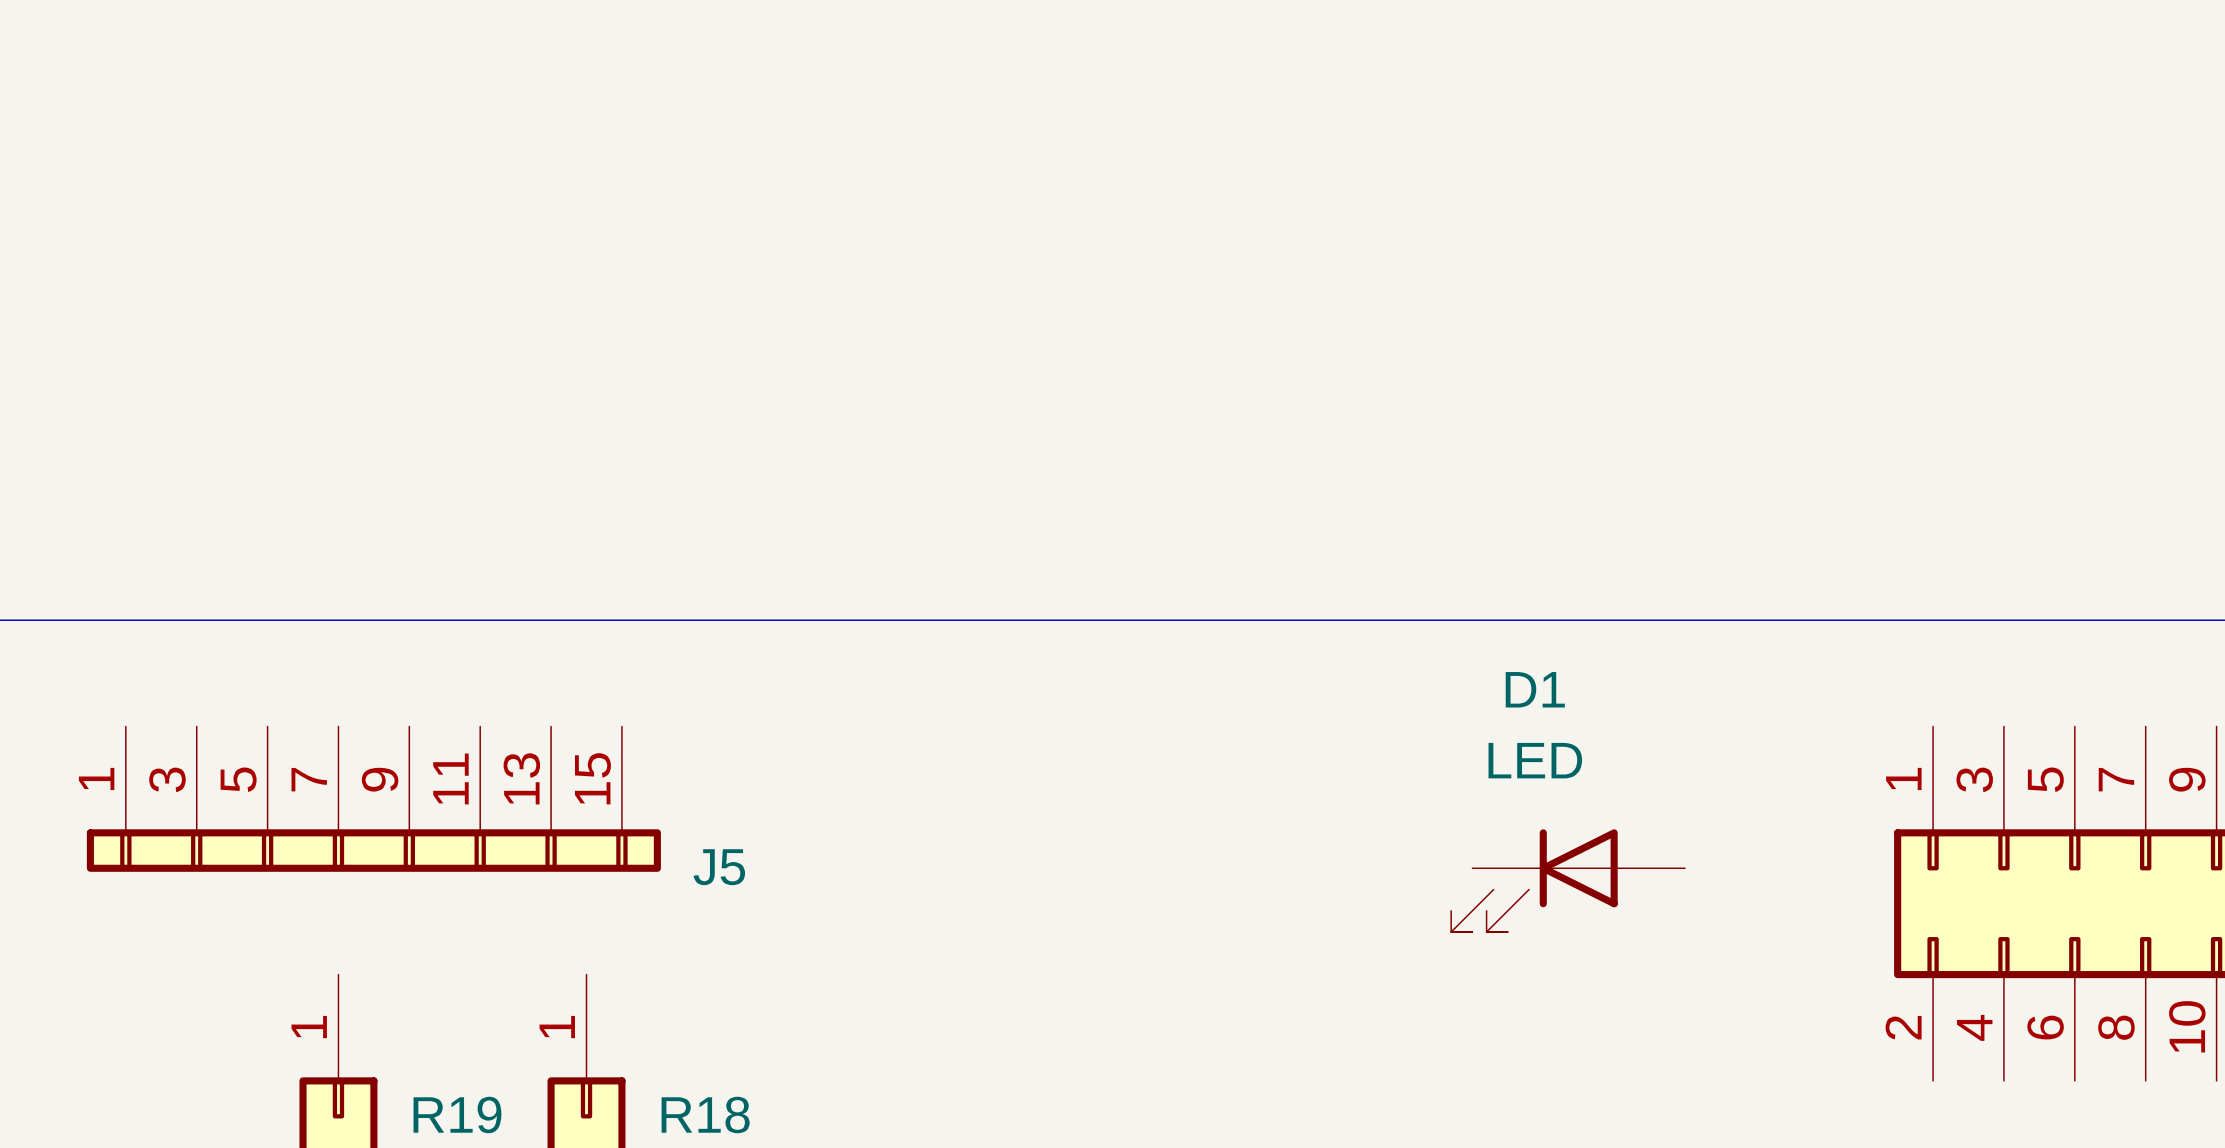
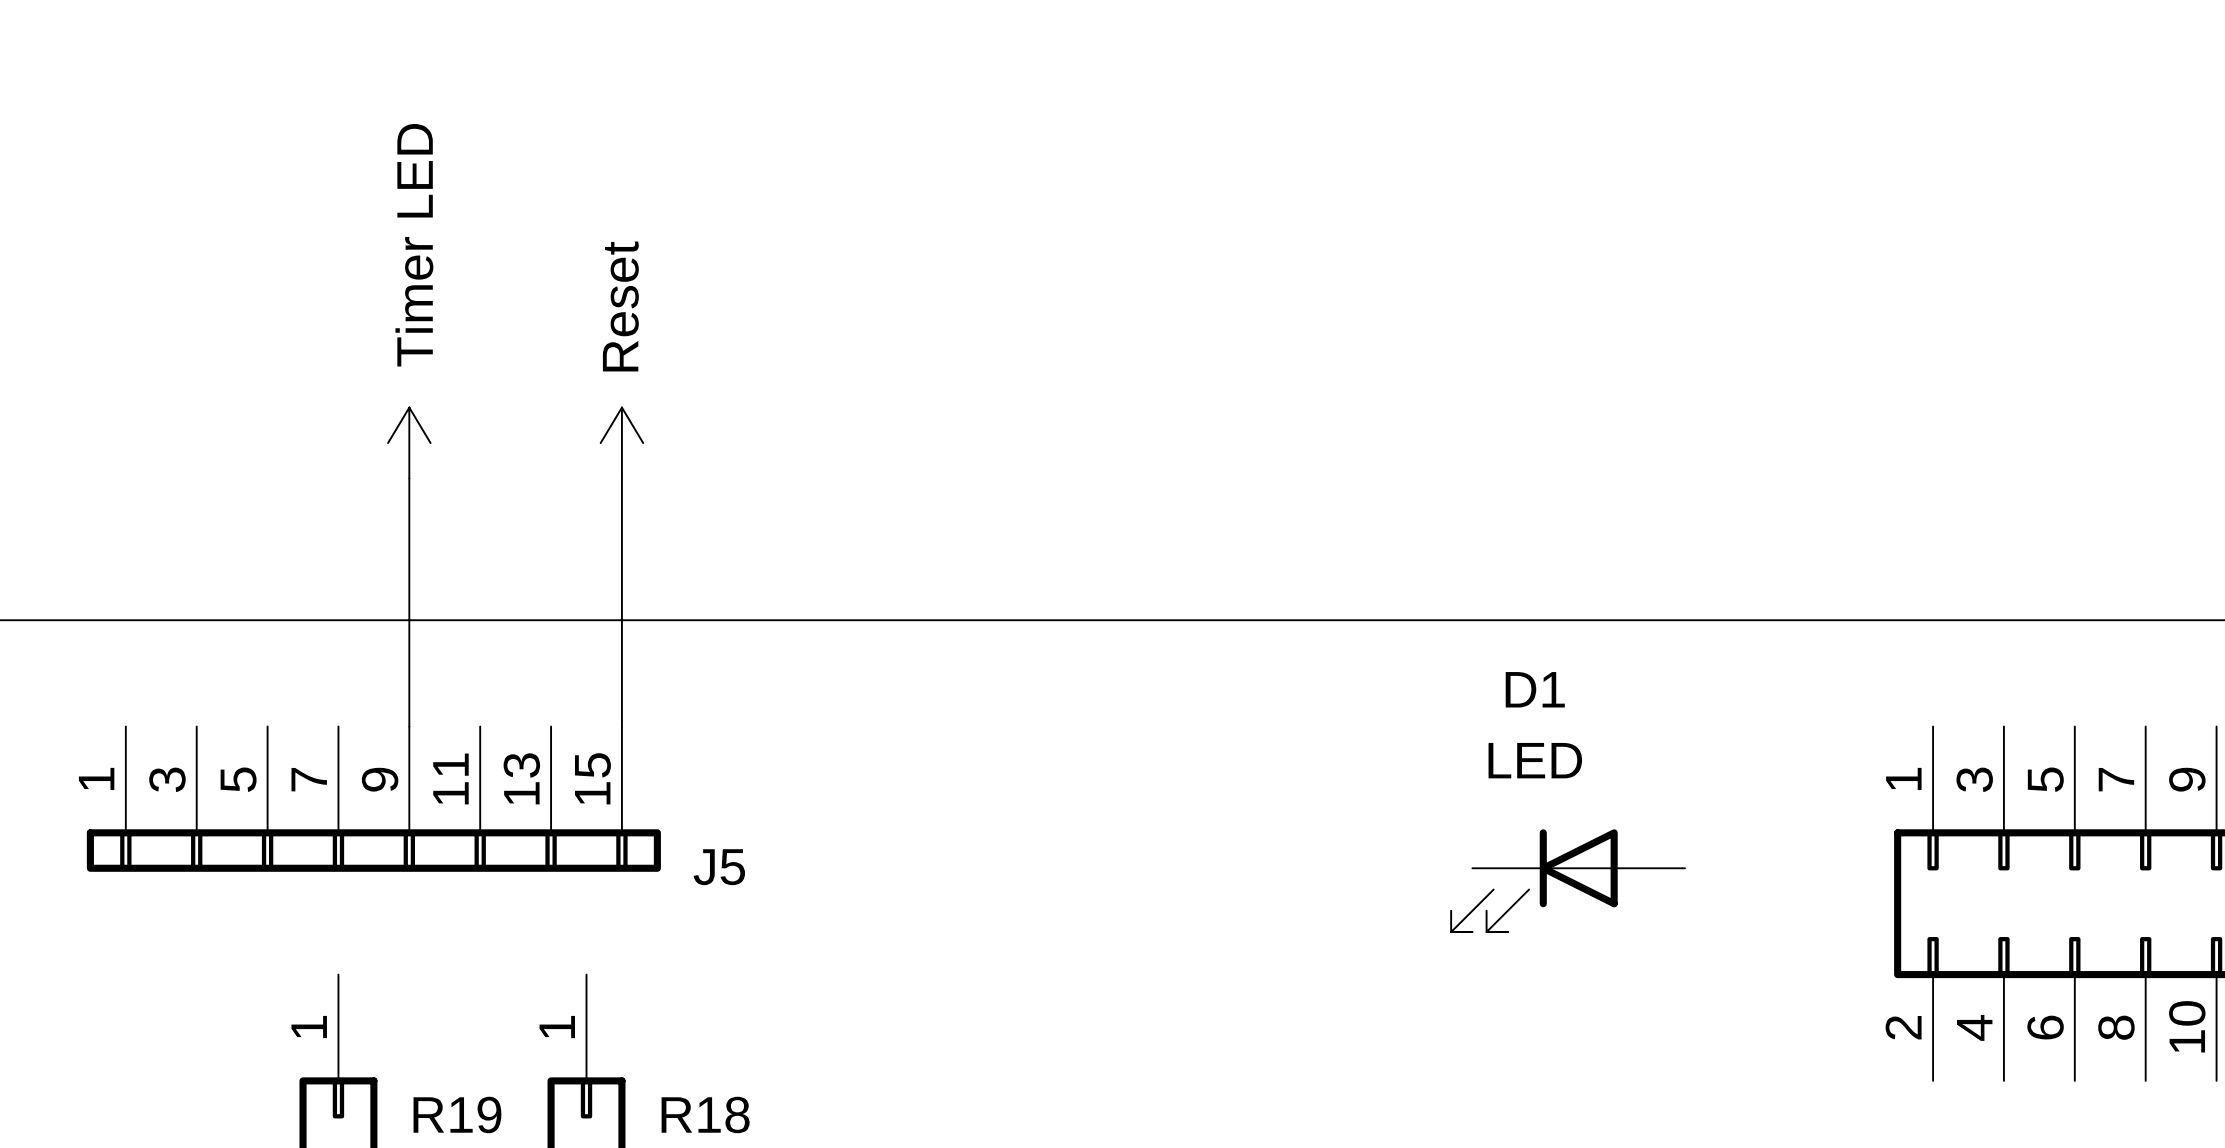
power symbol: none -> Timer LED (409, 443)
power symbol: none -> Reset (621, 443)
wire: none -> (409, 478) (409, 726)
wire: none -> (621, 478) (621, 726)

